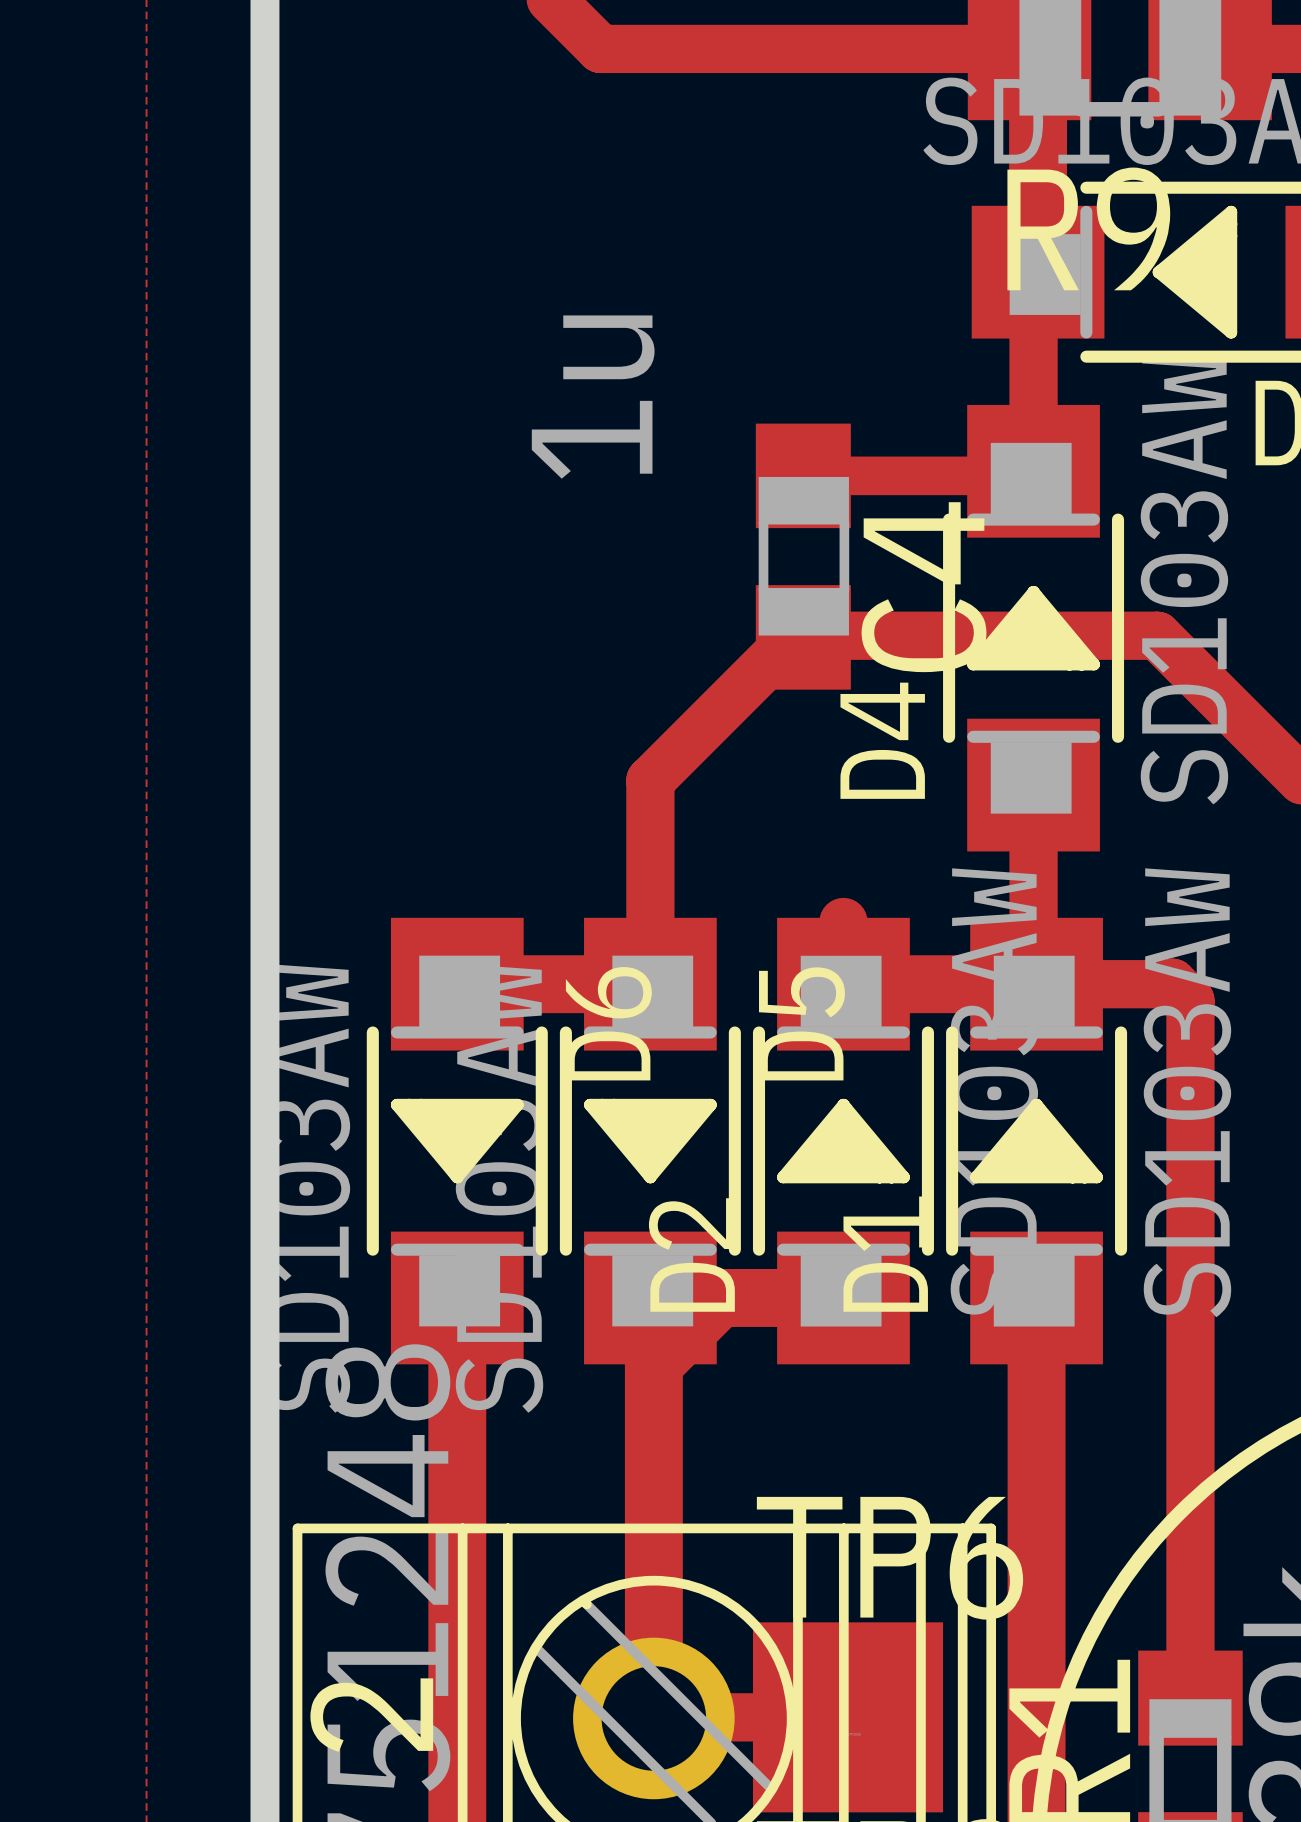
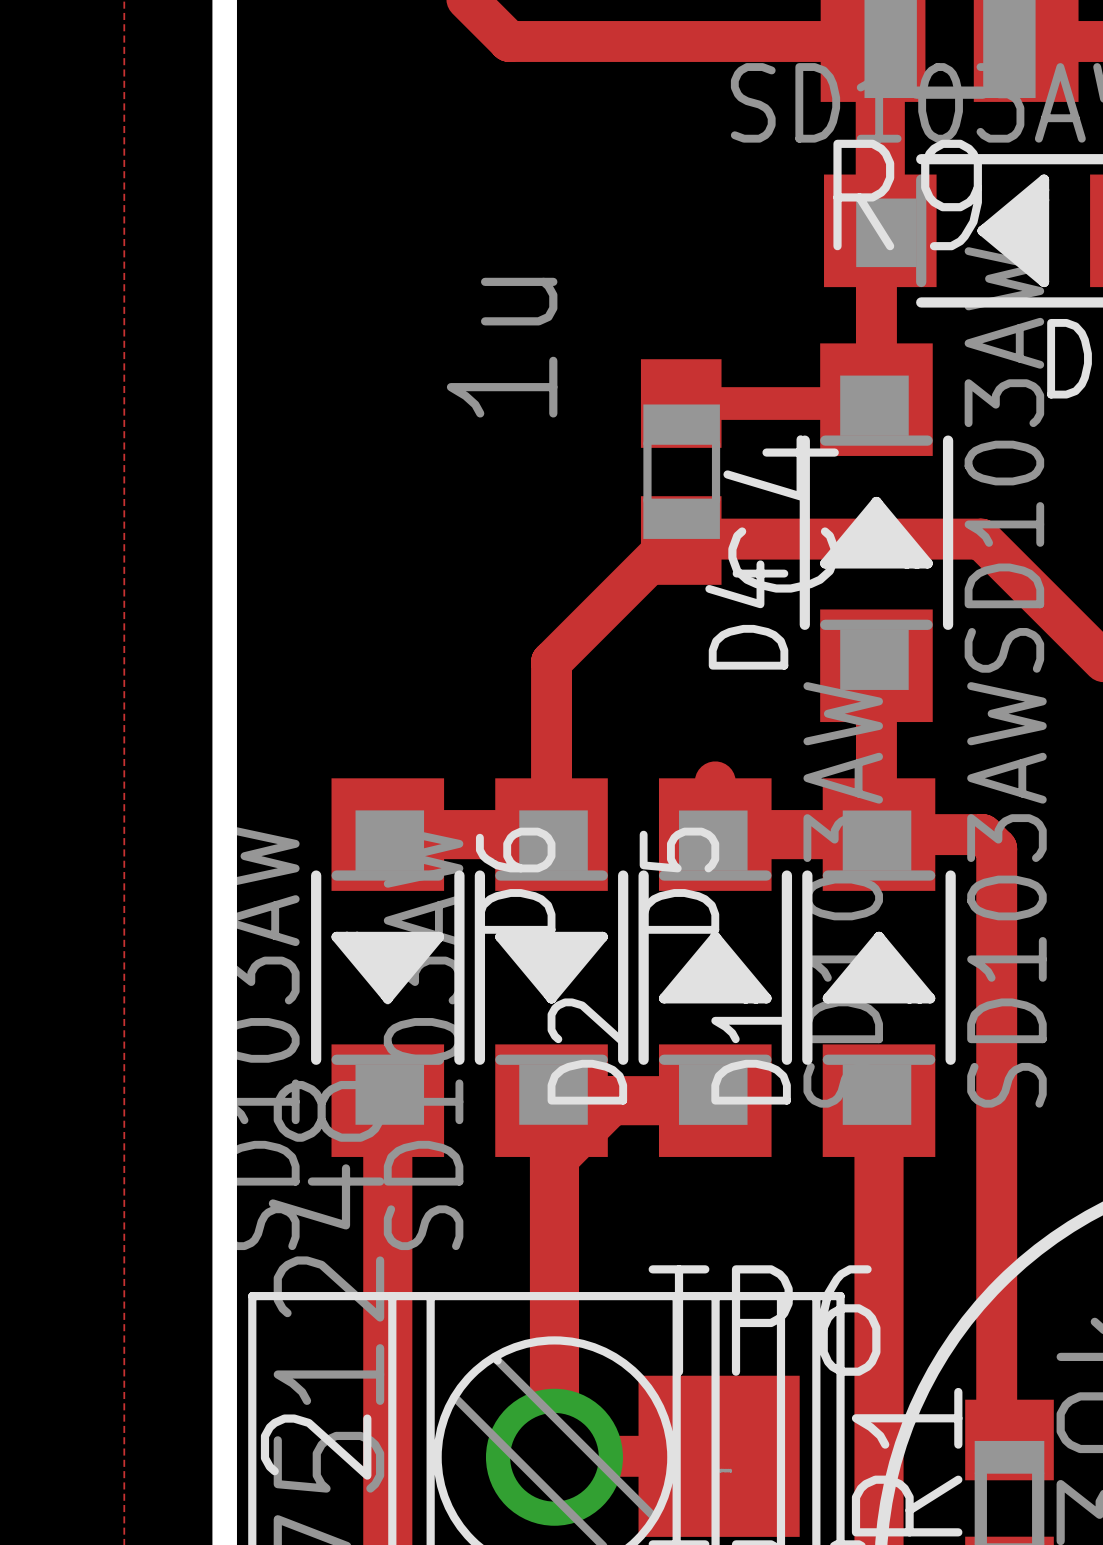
track: (1158, 984) (1172, 982) (1190, 1000) (1190, 1698) -> (982, 834) (996, 848) (996, 1427) (1009, 1439)

